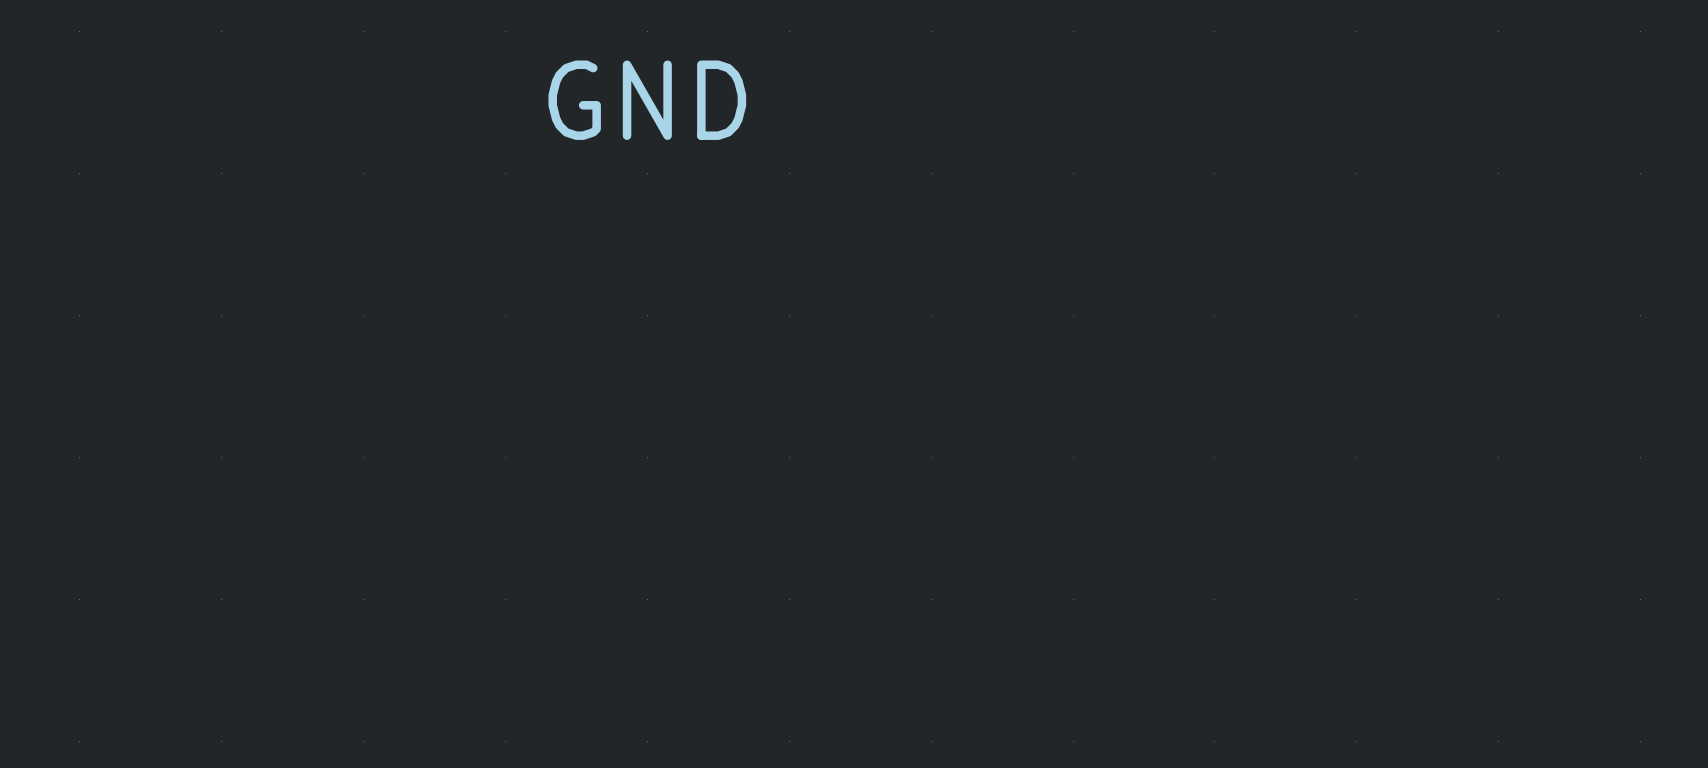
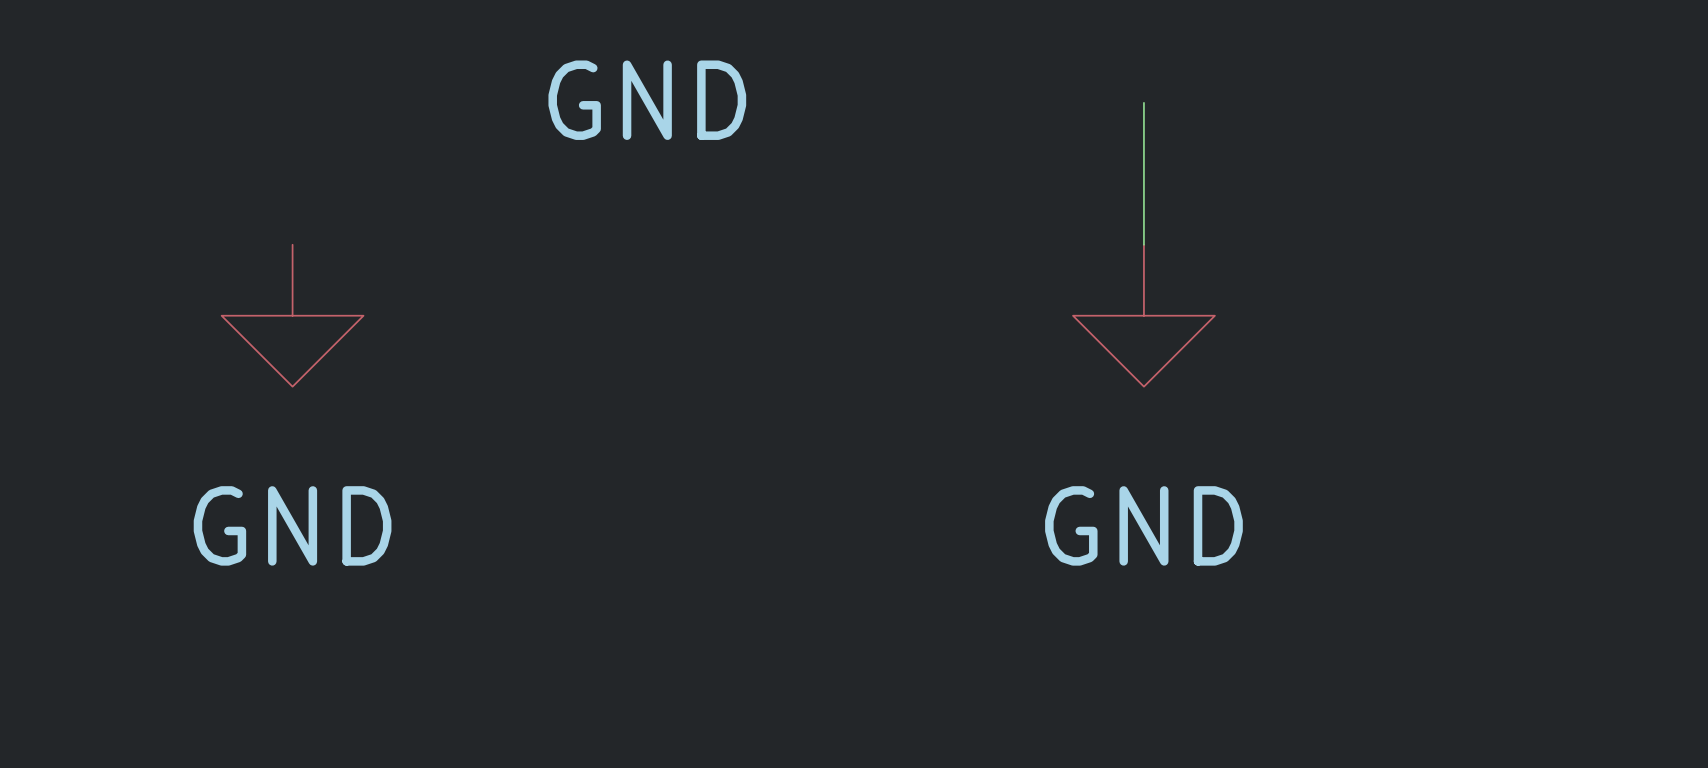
wire: none -> (1143, 102) (1143, 244)
power symbol: none -> GND (292, 315)
power symbol: none -> GND (1143, 315)

